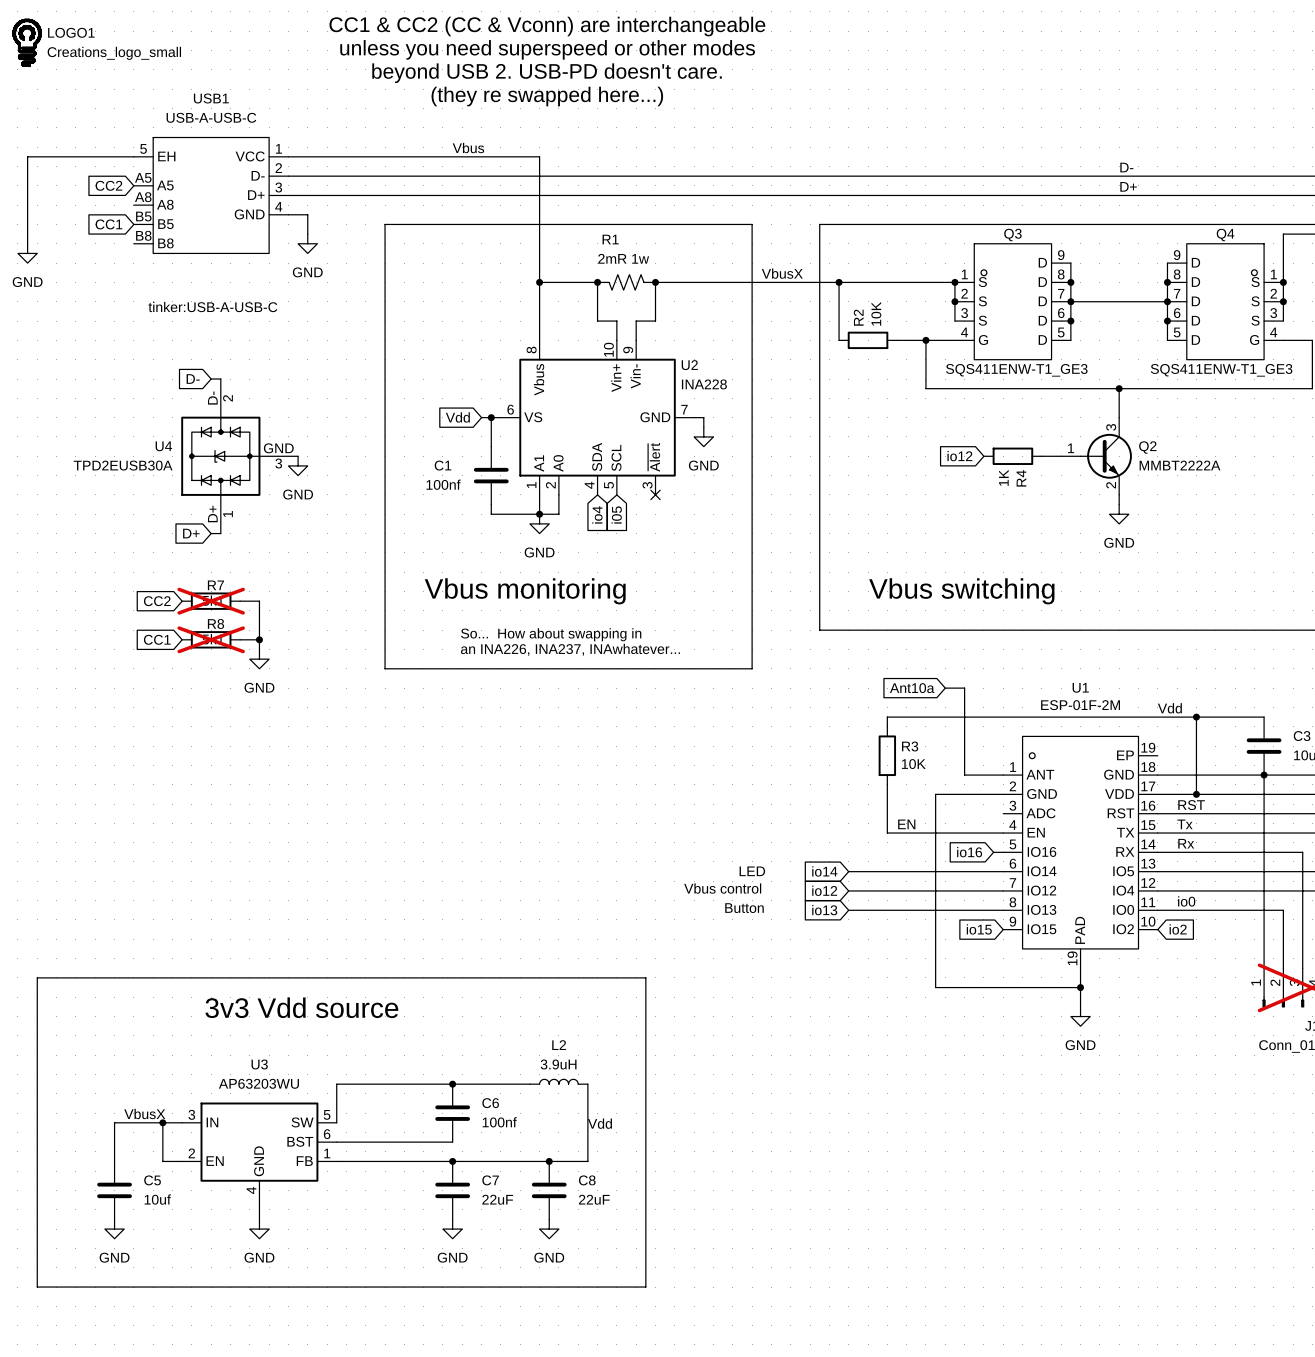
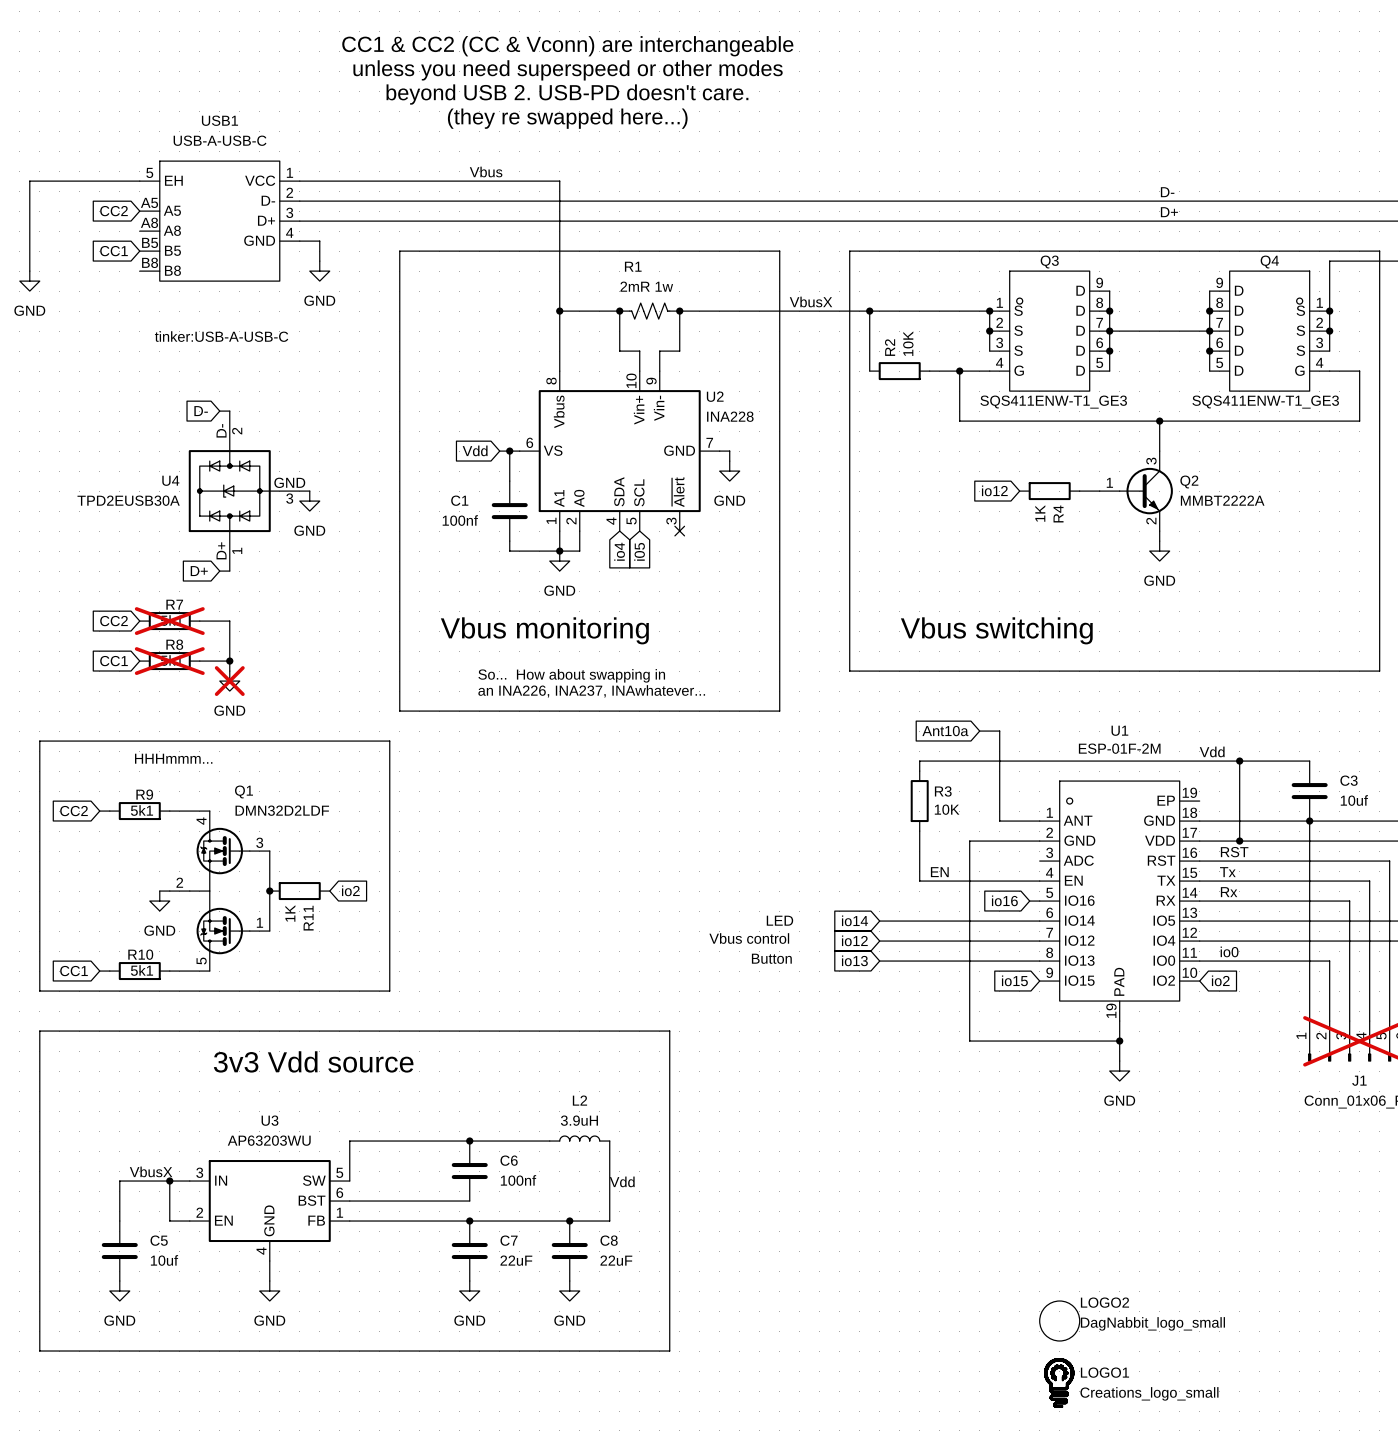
LOGO1 position: (27, 42) -> (1059, 1383)
wire: none -> (199, 621) (229, 621) (229, 671)
global label position: CC2 (157, 601) -> CC2 (113, 621)
R7 position: (211, 601) -> (169, 621)
wire: (240, 601) (259, 601) (259, 649) -> none
wire: none -> (199, 661) (229, 661)
global label position: CC1 (157, 639) -> CC1 (114, 661)
R8 position: (211, 639) -> (169, 661)
power symbol do-not-place cross: none -> (229, 681)
wire: (240, 639) (259, 639) -> none
junction position: (259, 639) -> (229, 661)
power symbol position: GND (259, 659) -> GND (229, 681)
line: none -> (39, 741) (389, 741) (389, 991) (39, 991) (39, 741)
text: none -> HHHmmm... (173, 758)
global label: none -> CC2 (74, 811)
wire: none -> (99, 811) (109, 811)
R9: none -> 5k1 (139, 811)
wire: none -> (169, 811) (209, 811)
wire: none -> (269, 851) (269, 931)
wire: none -> (159, 891) (169, 891)
Q1: none -> DMN32D2LDF (219, 891)
junction: none -> (269, 891)
R11: none -> 1K (299, 891)
global label: none -> io2 (350, 890)
power symbol: none -> GND (159, 901)
global label: none -> CC1 (74, 971)
wire: none -> (99, 971) (109, 971)
R10: none -> 5k1 (139, 971)
wire: none -> (169, 971) (209, 971)
LOGO2: none -> DagNabbit_logo_small (1059, 1321)

